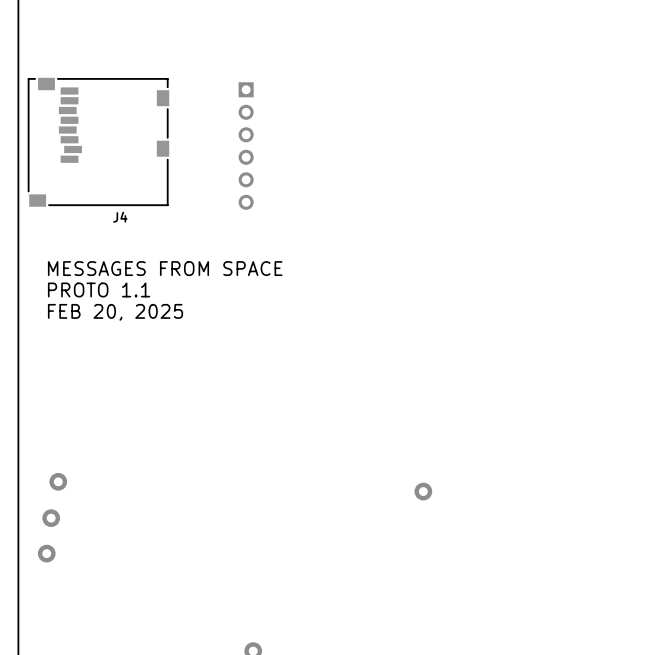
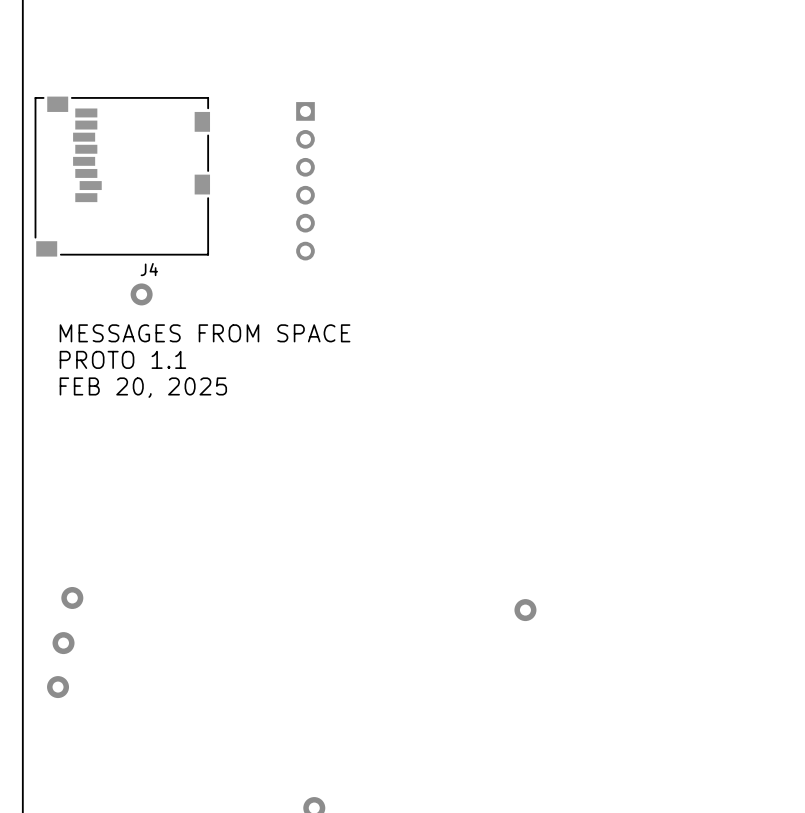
part: none -> (141, 294)

